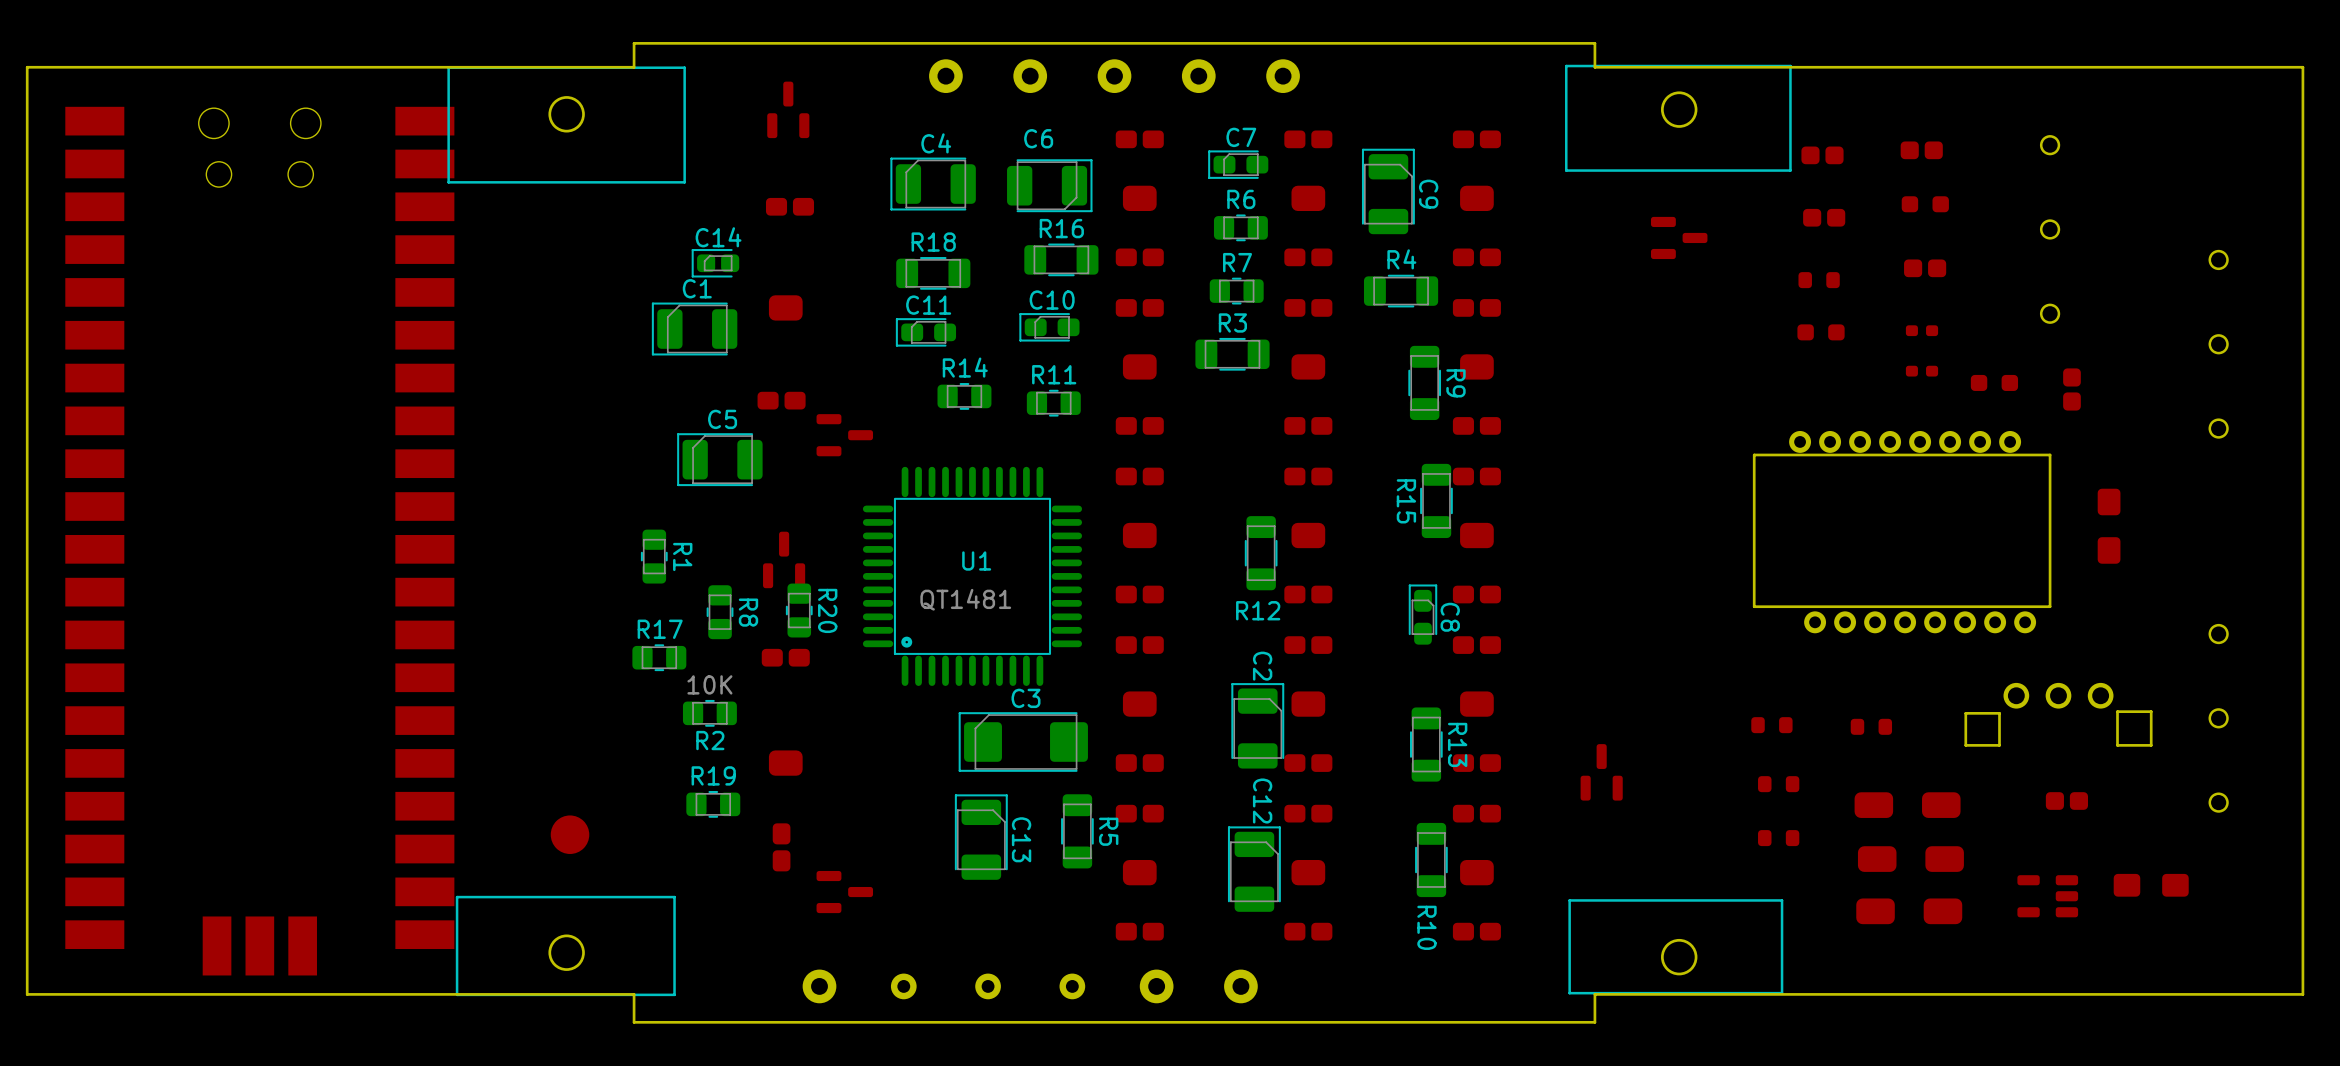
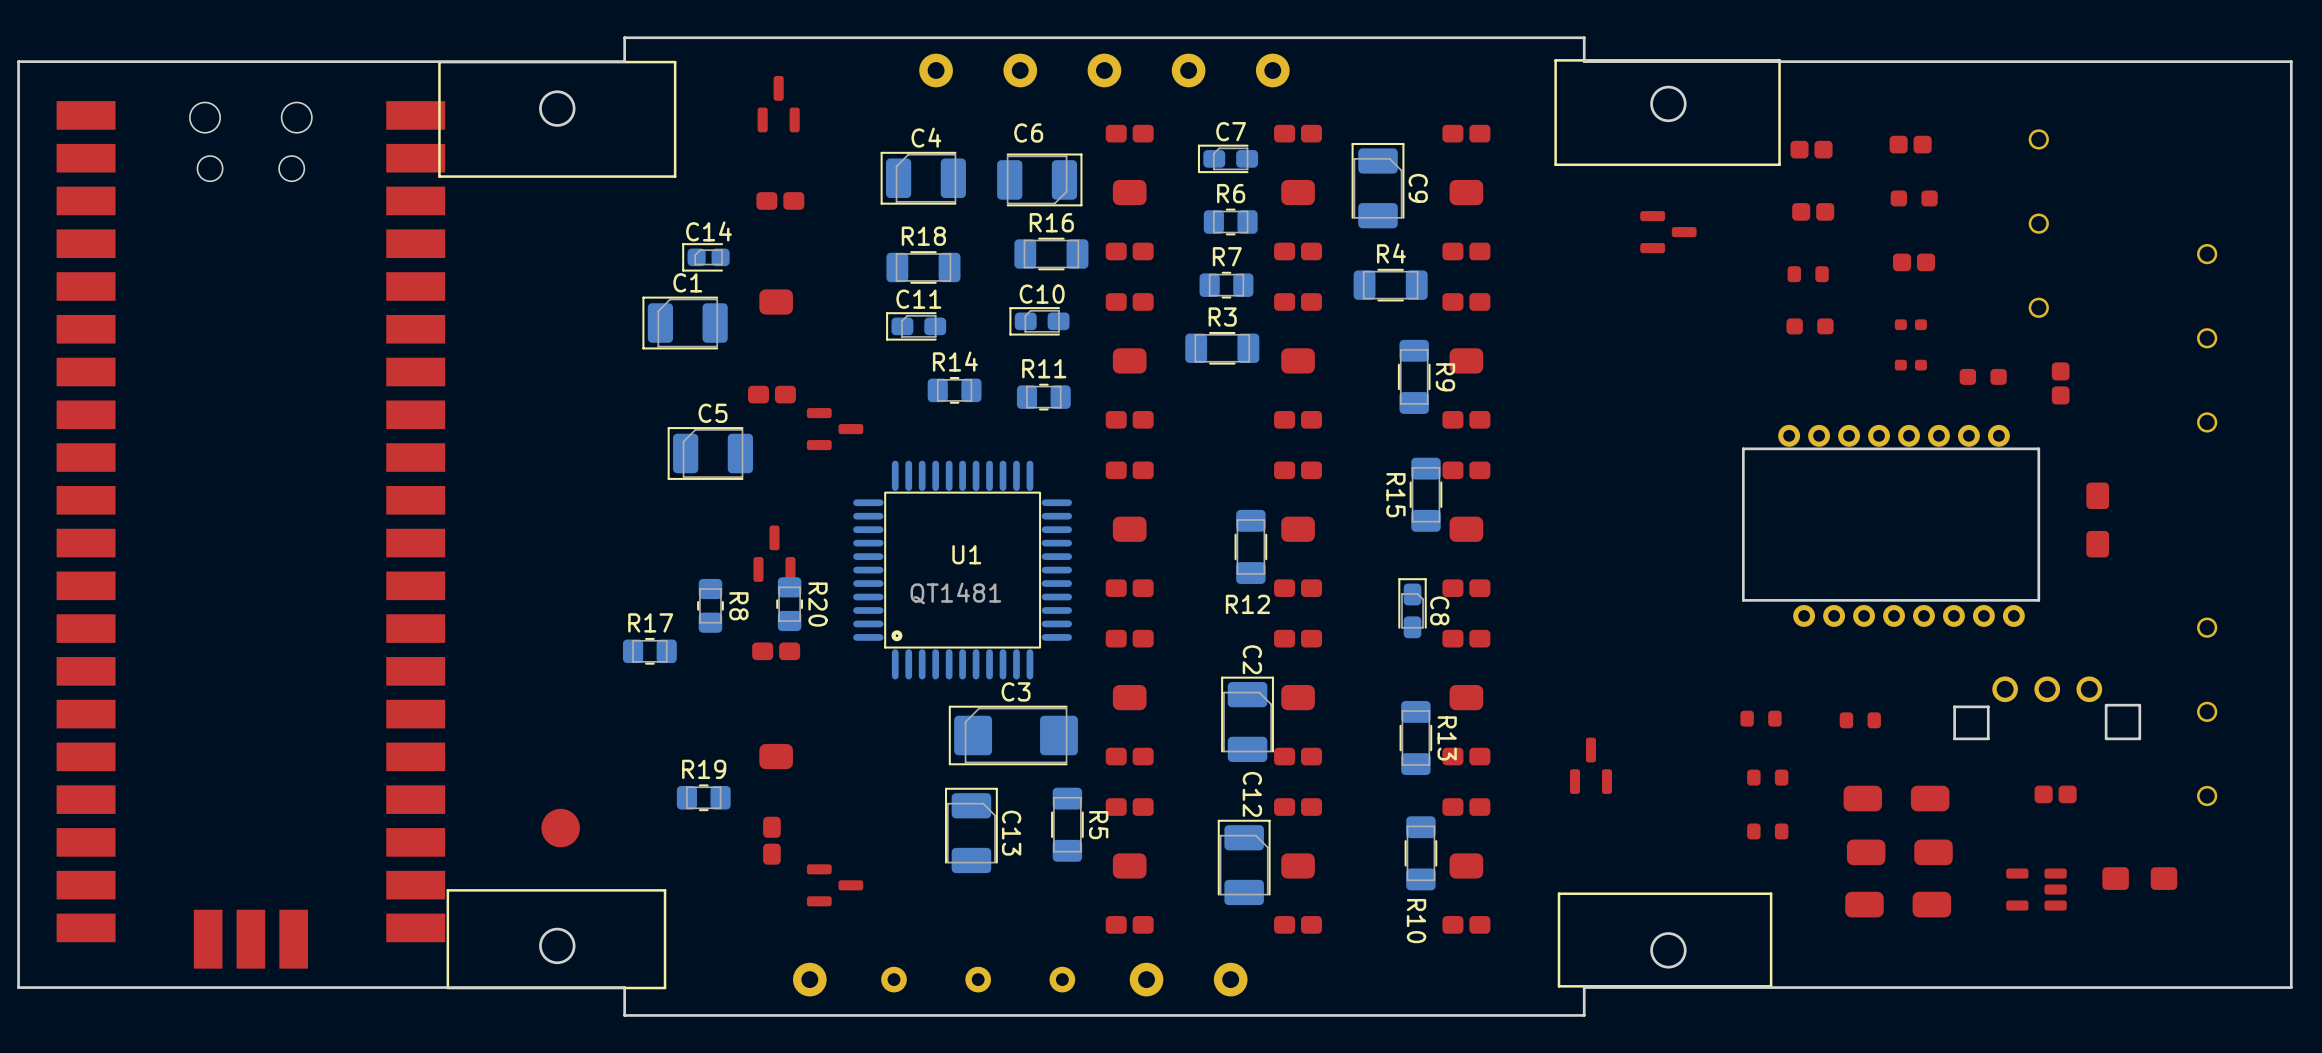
R1: (654, 556) -> none
R2: 10K (709, 713) -> none

